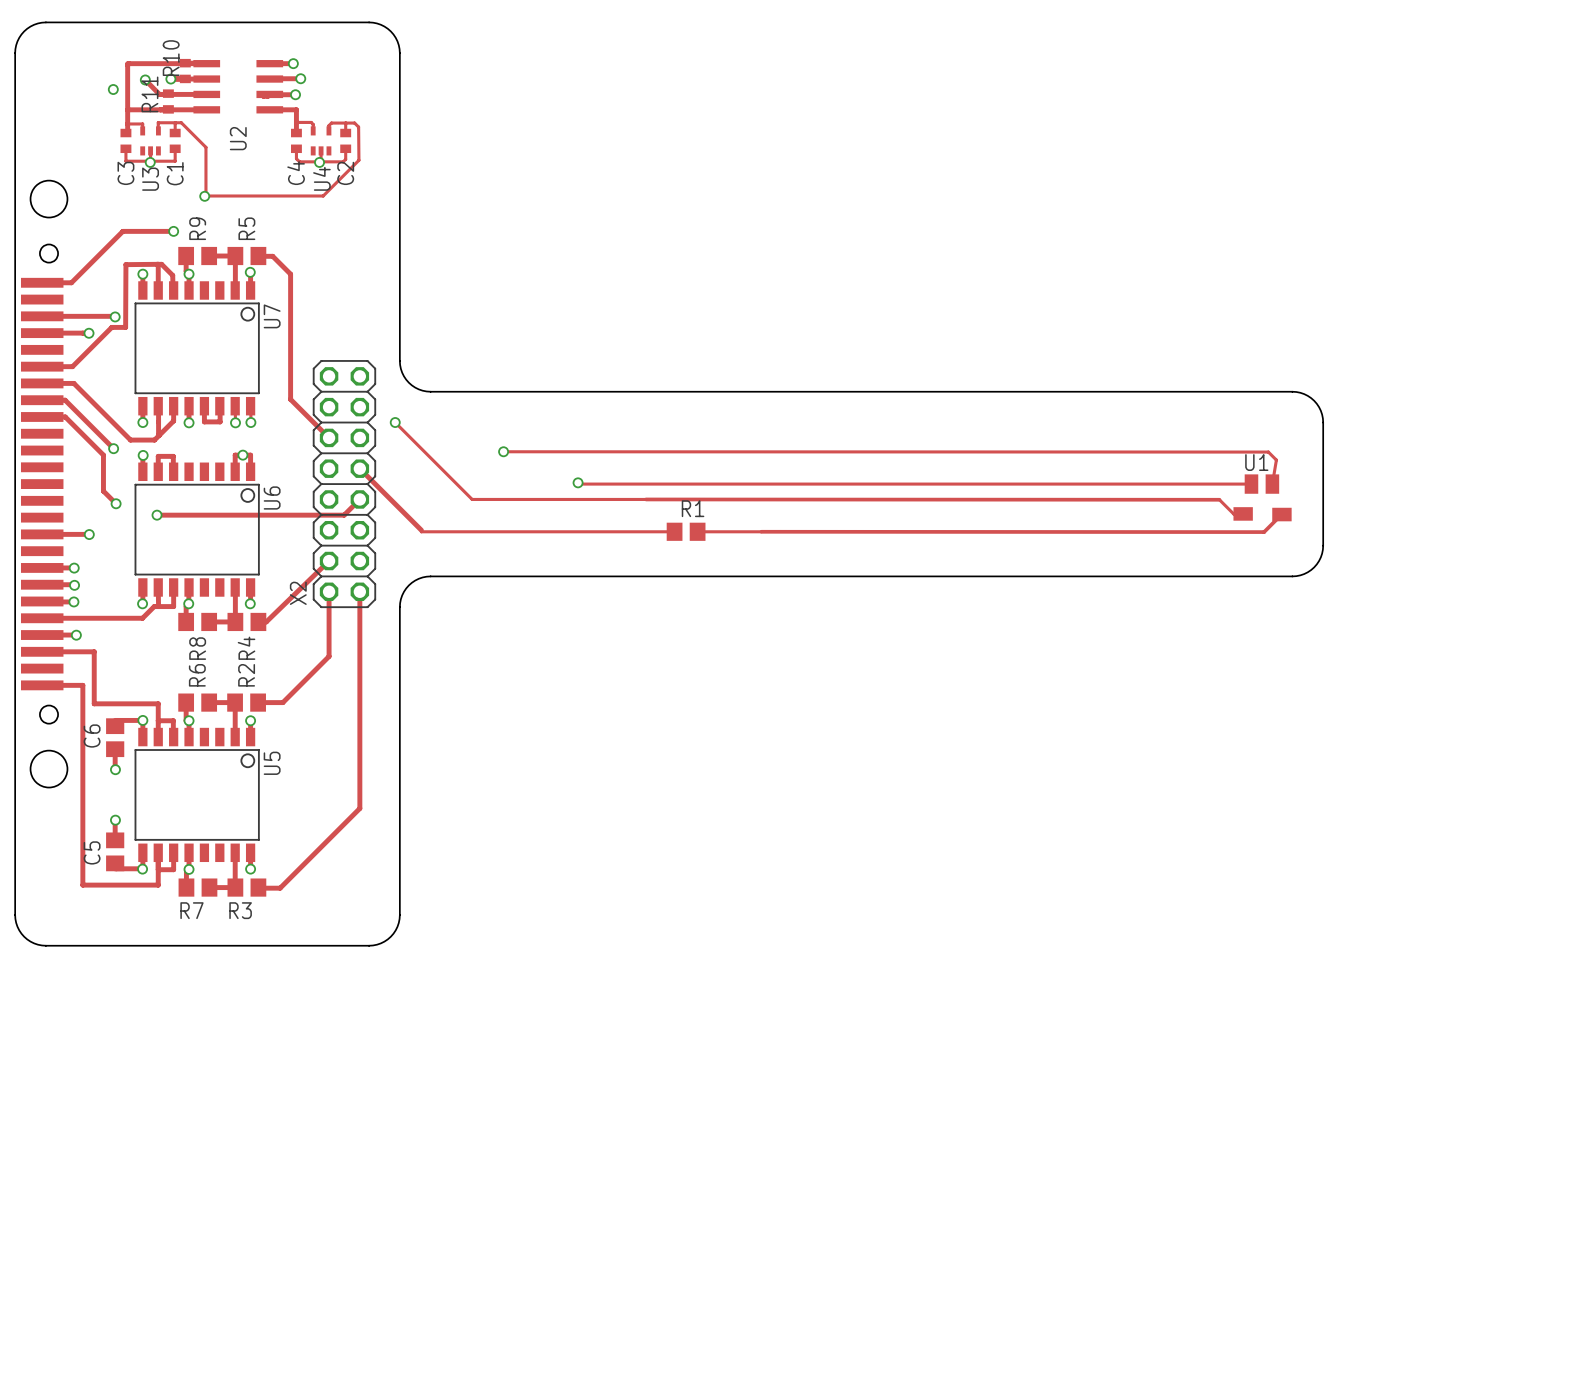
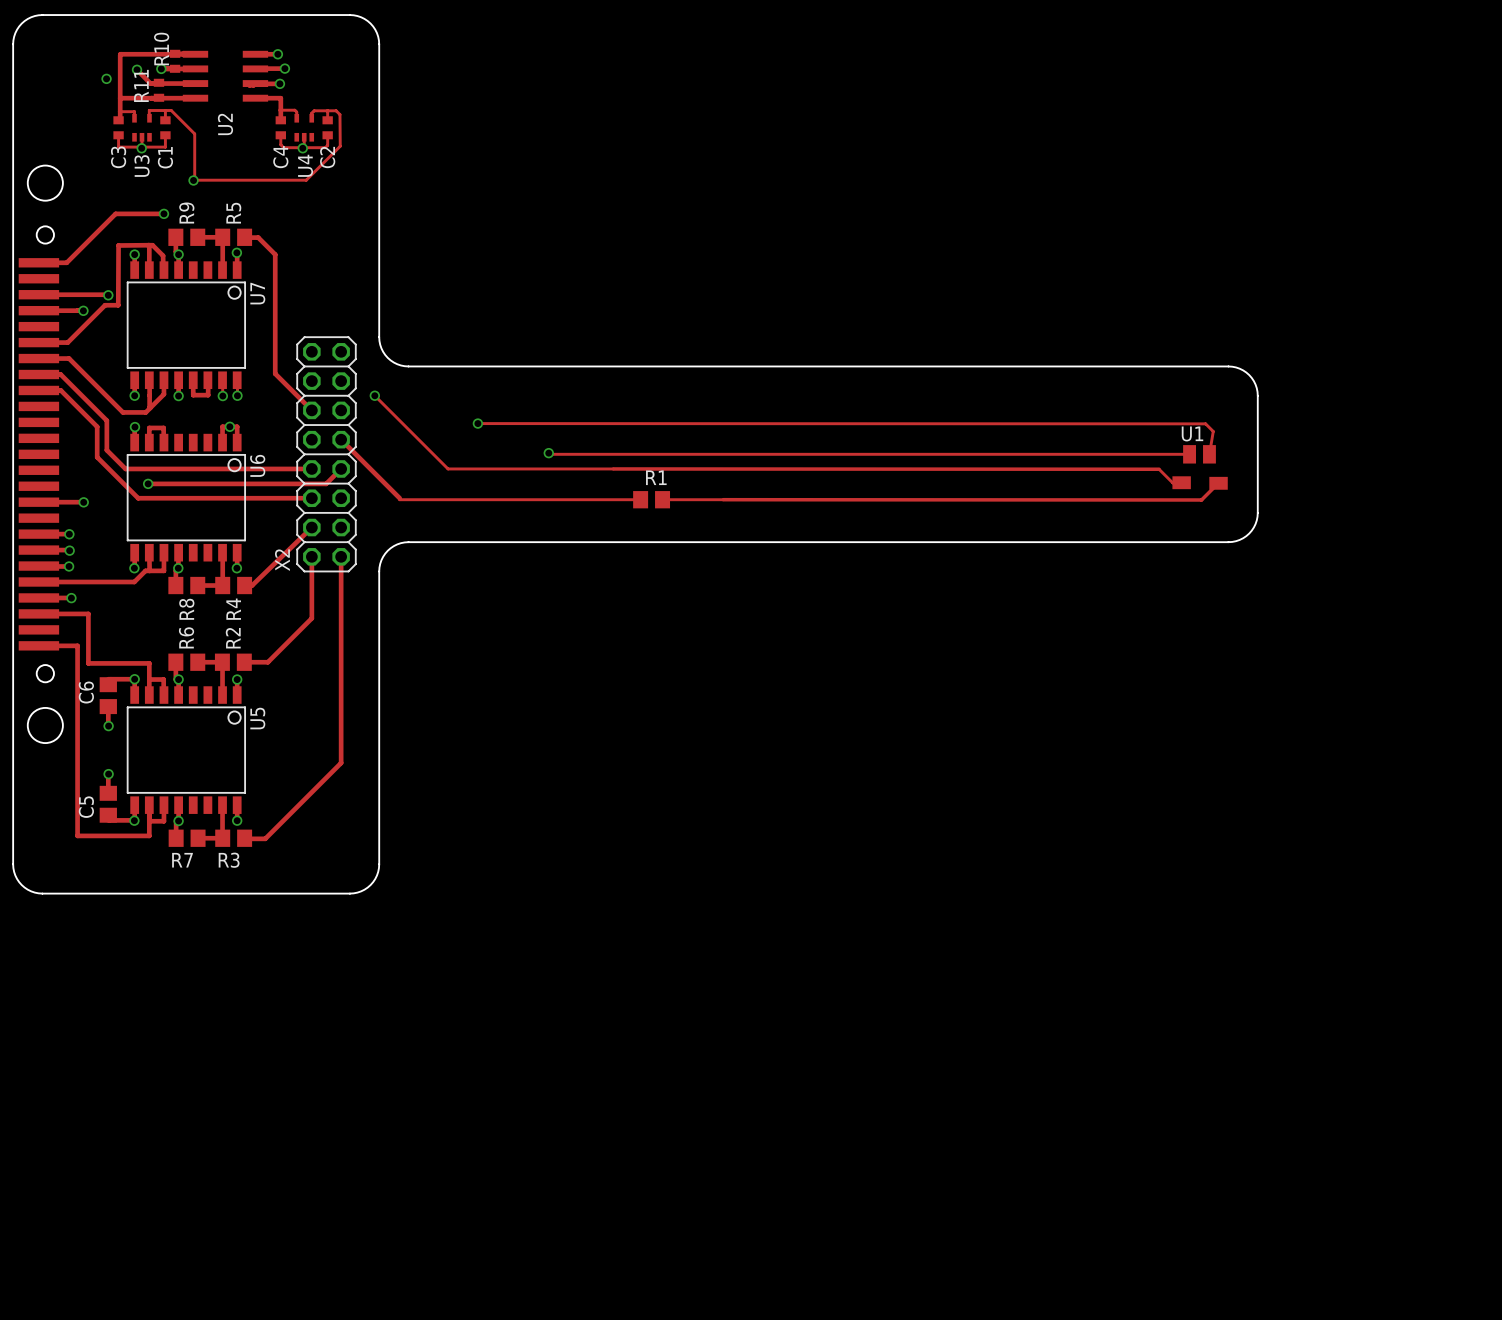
track: none -> (106, 420) (106, 450) (125, 468) (311, 468)
via: (113, 448) -> none
track: (103, 487) (103, 491) (116, 503) -> (97, 457) (138, 498) (311, 498)
via: (116, 503) -> none

